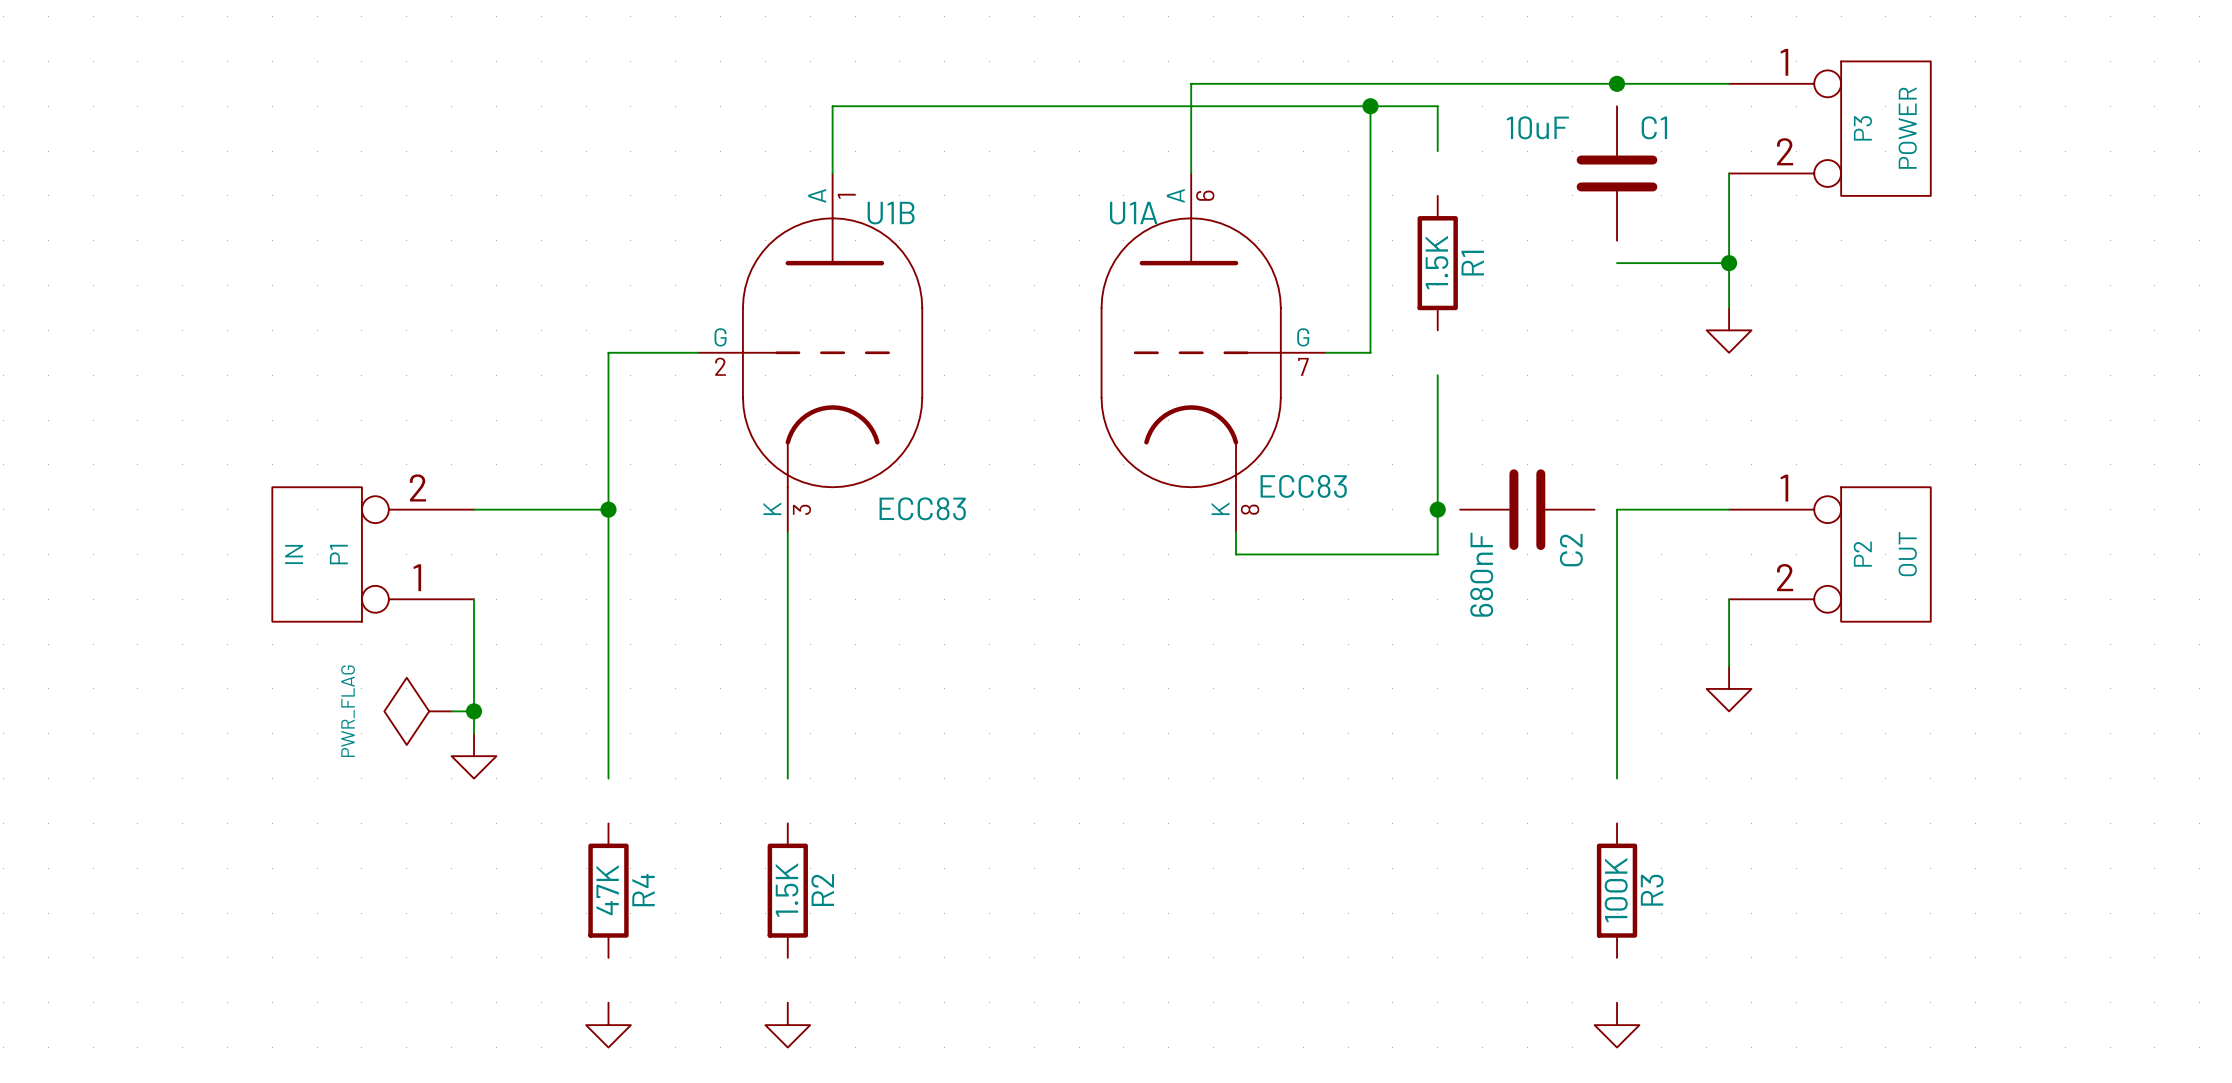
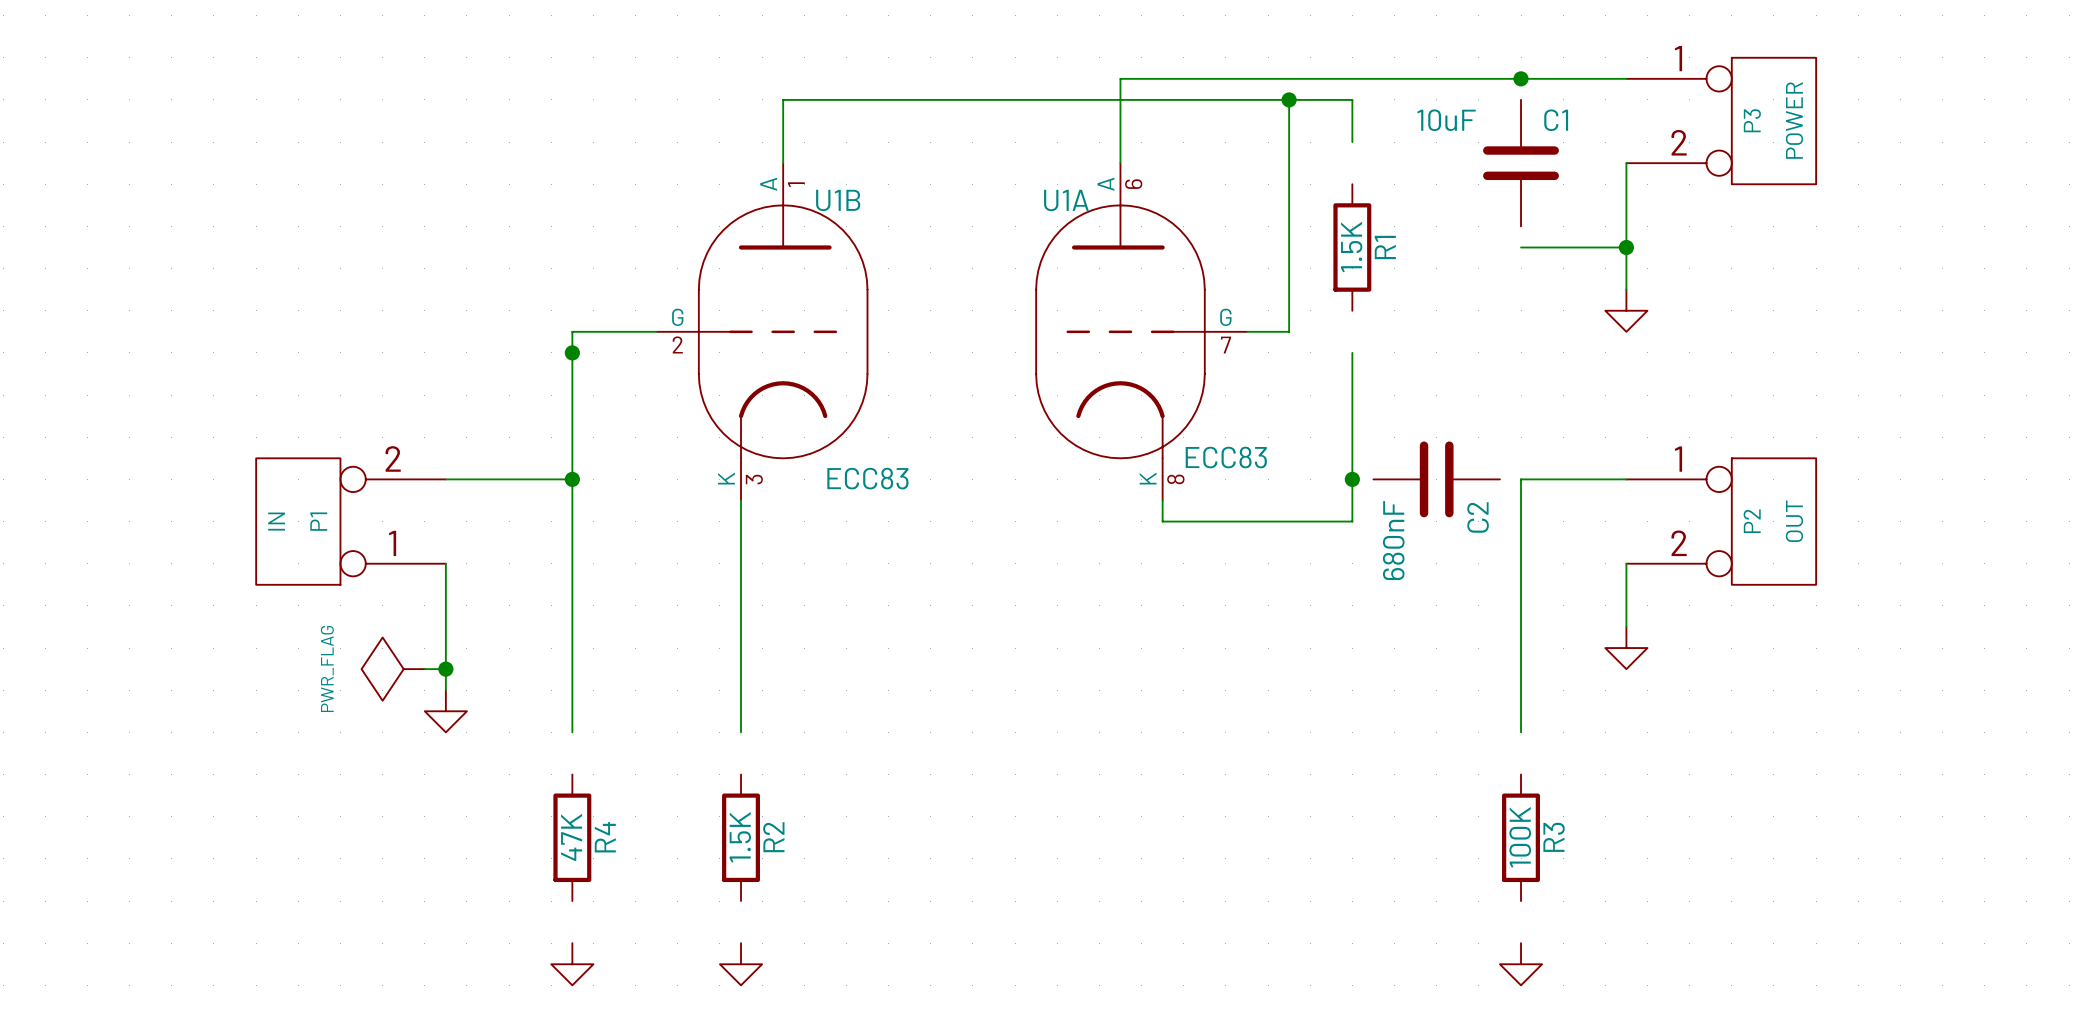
junction: none -> (572, 352)

